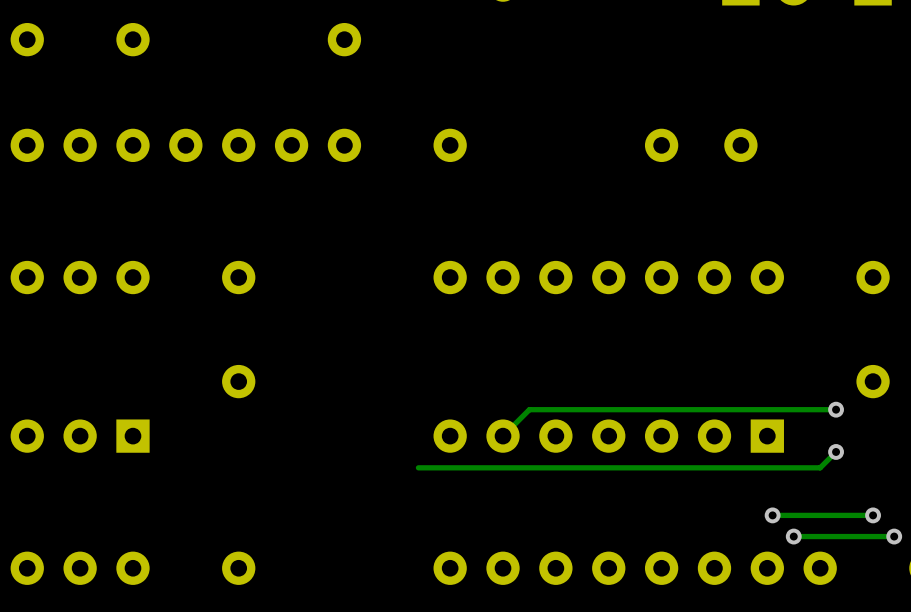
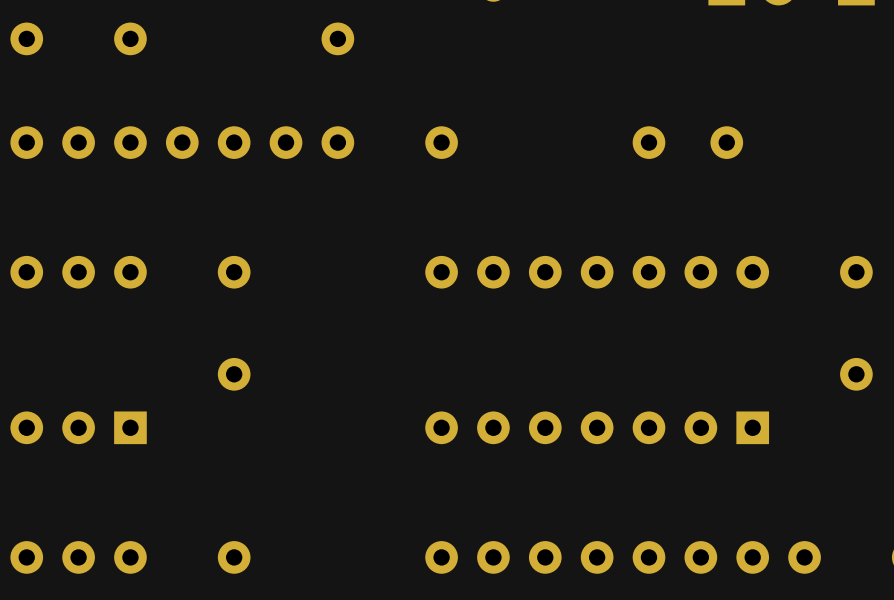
track: (836, 409) (529, 409) (503, 436) -> none
via: (836, 409) -> none
track: (836, 451) (820, 467) (418, 467) -> none
via: (836, 451) -> none
via: (772, 515) -> none
track: (873, 515) (772, 515) -> none
via: (873, 515) -> none
via: (793, 536) -> none
track: (894, 536) (793, 536) -> none
via: (894, 536) -> none

